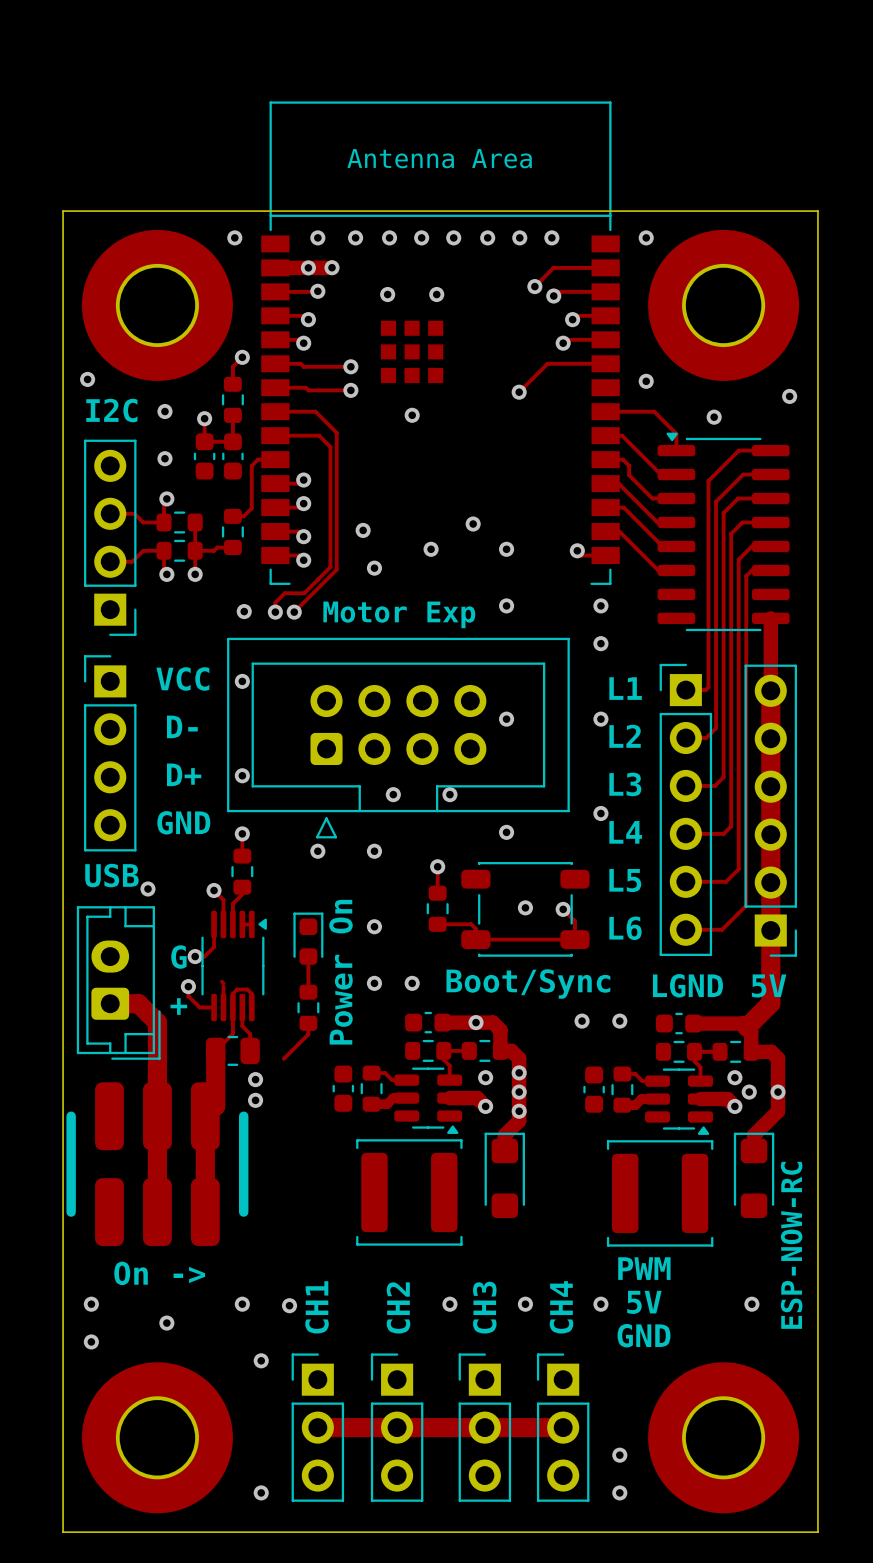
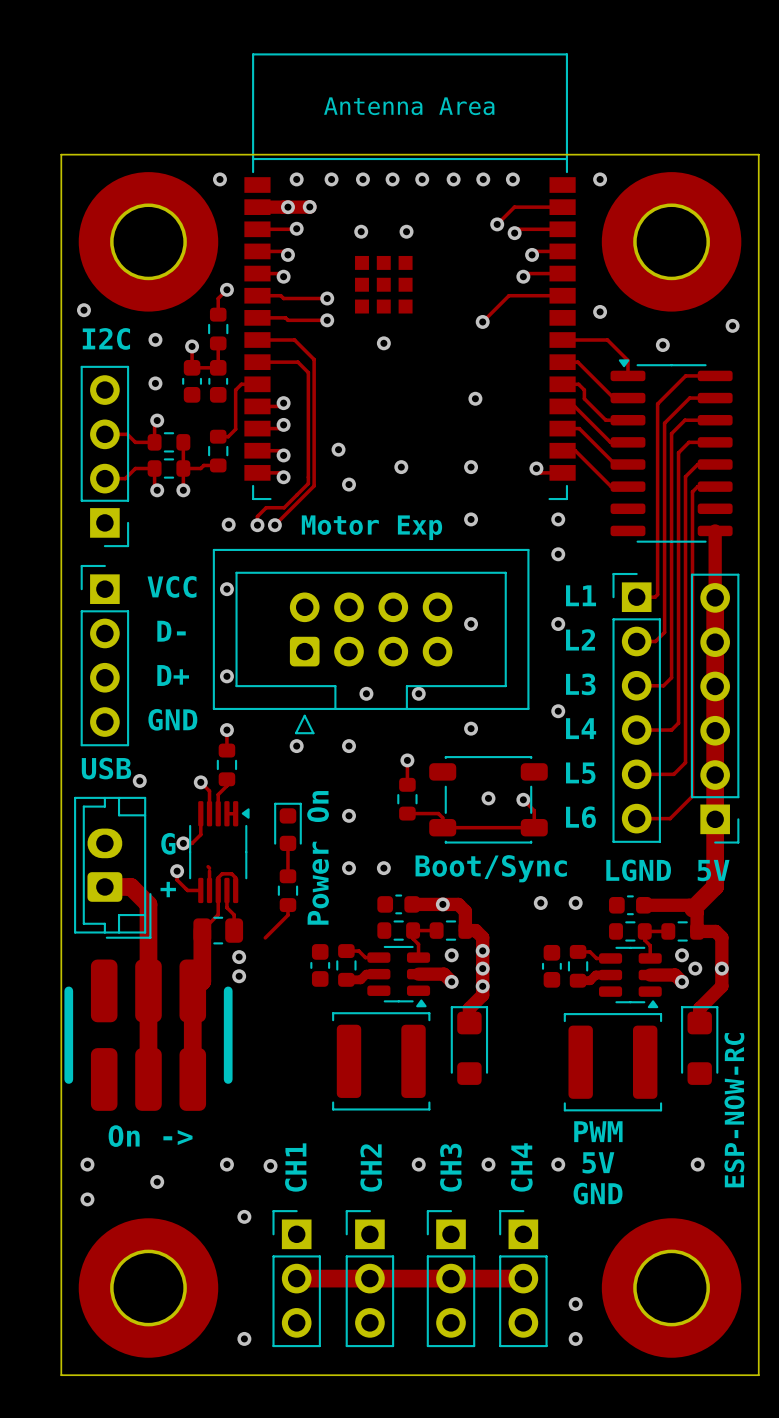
via position: (473, 524) -> (475, 398)

